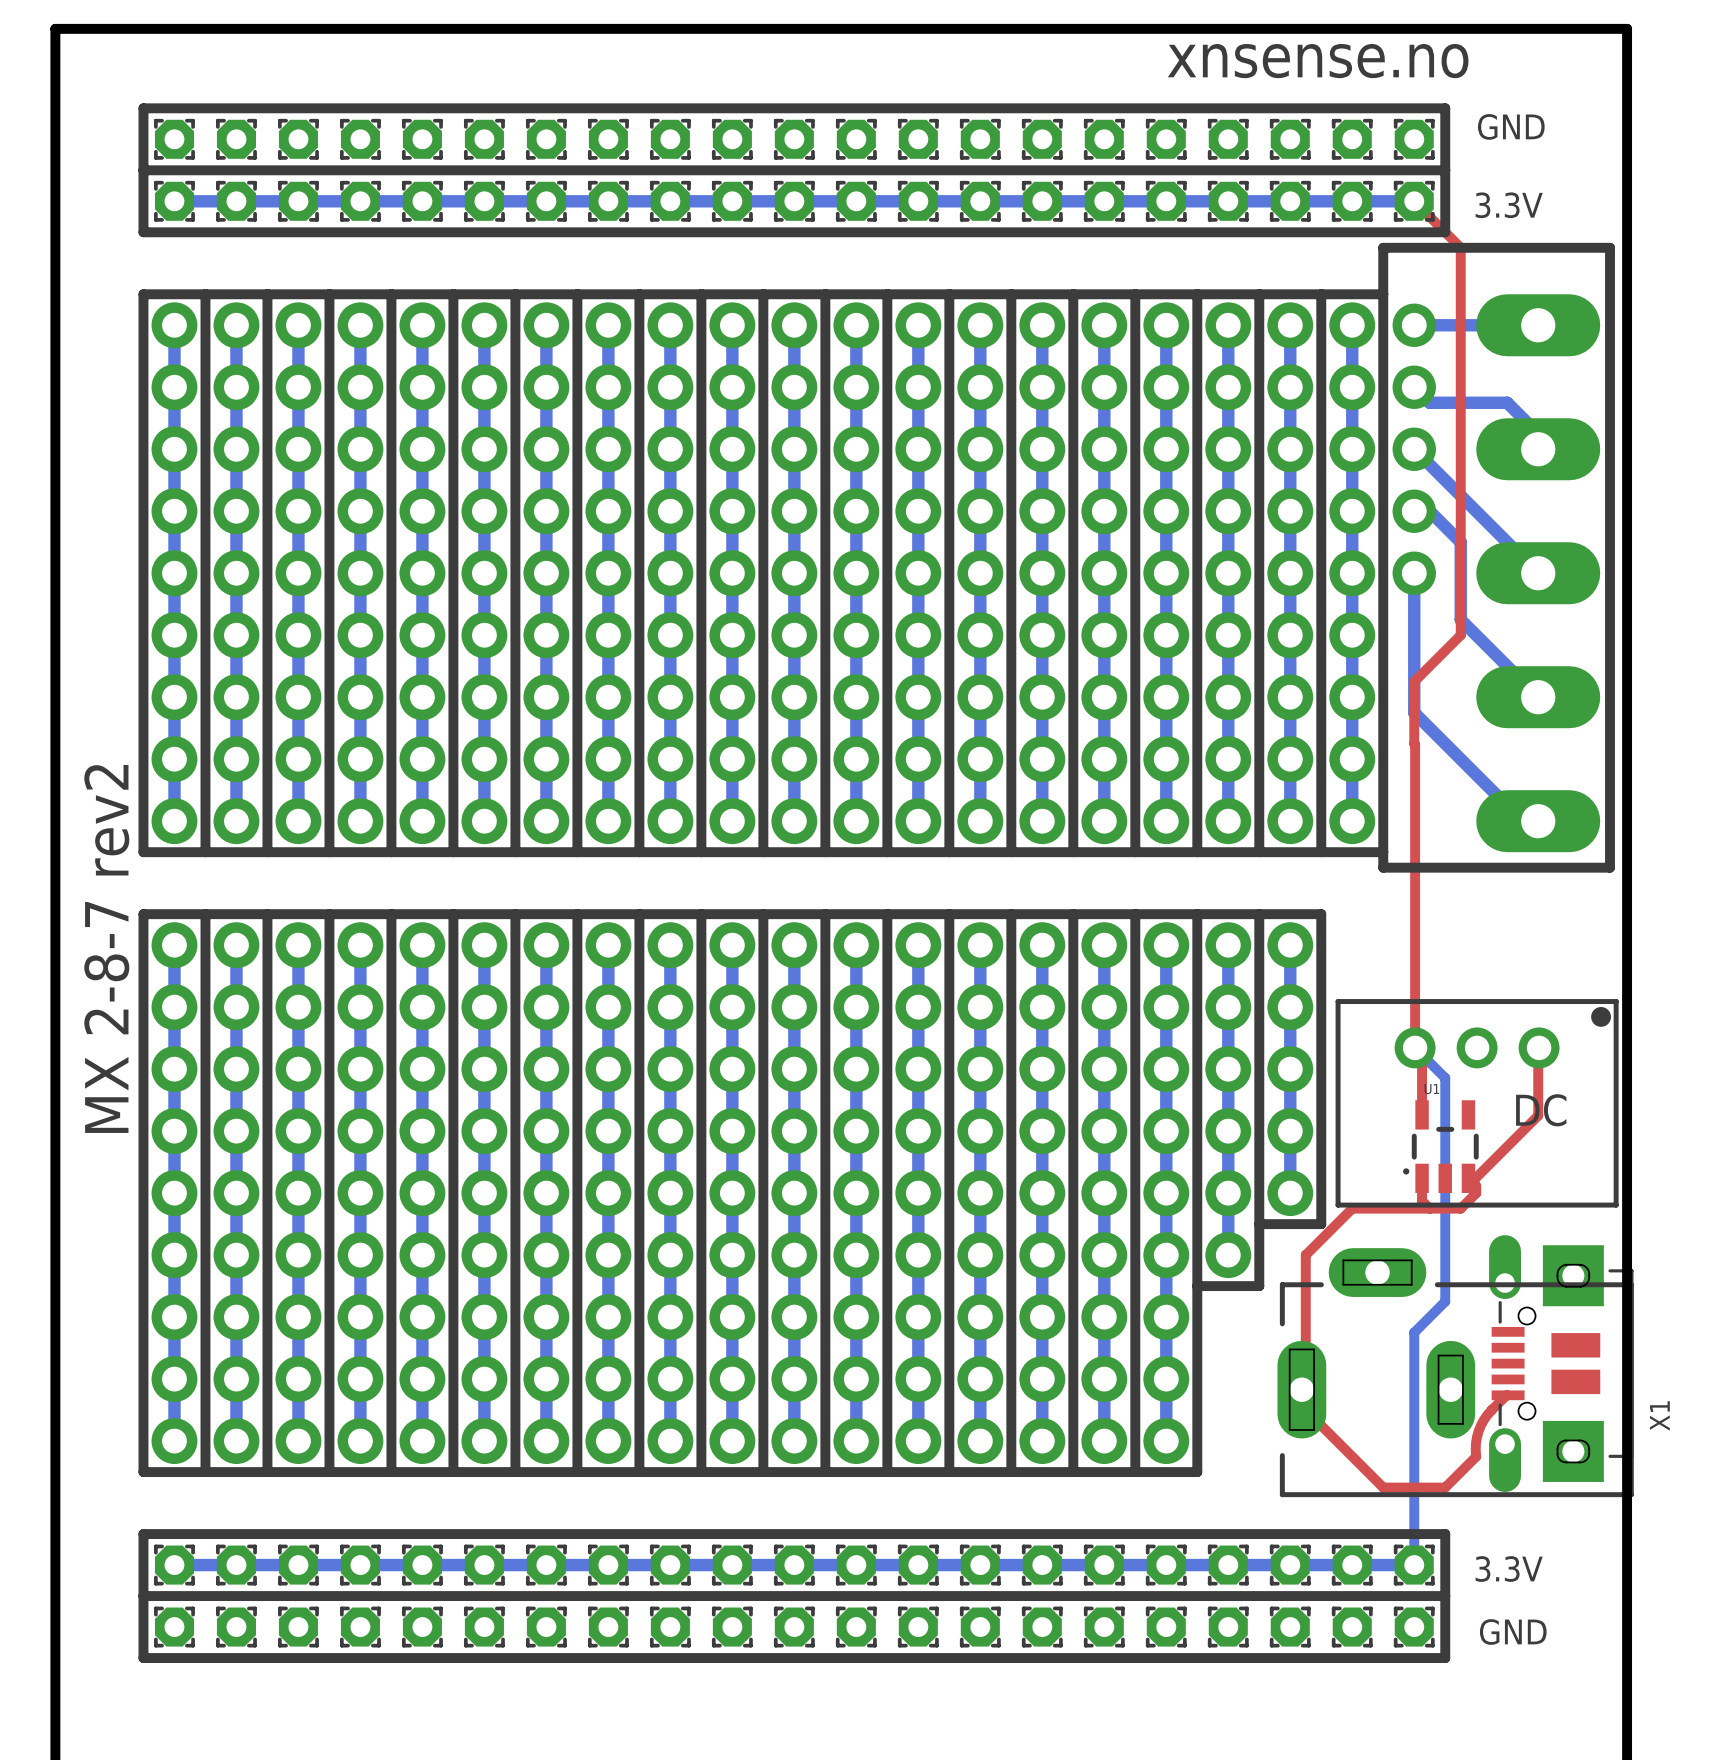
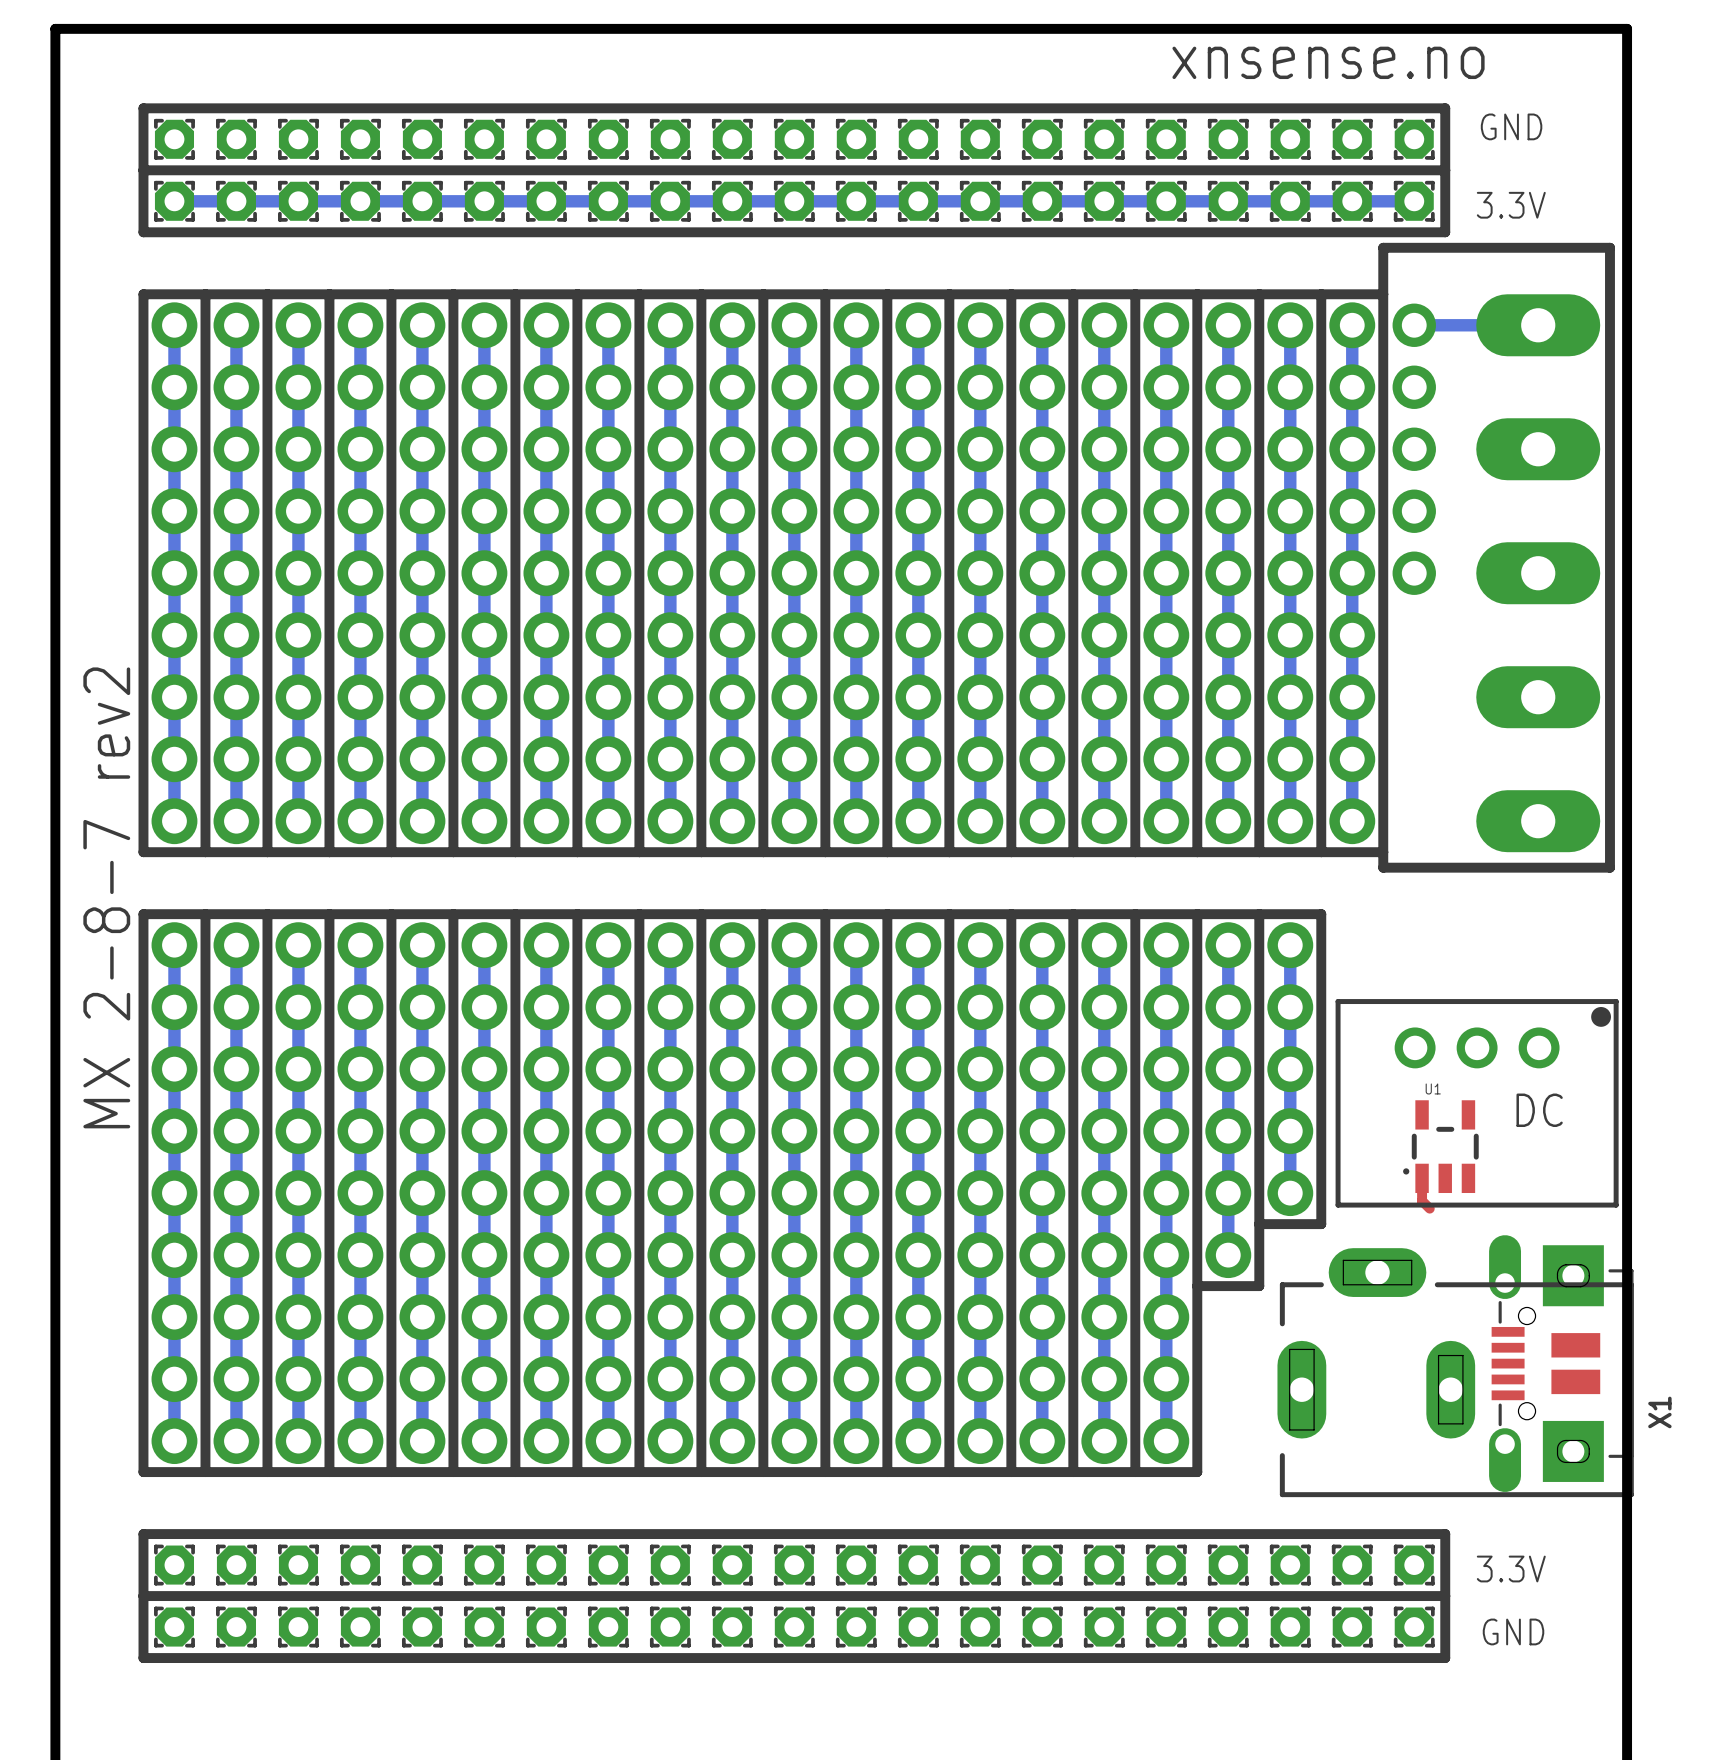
top track: (1414, 201) (1460, 247) (1460, 635) (1414, 681) (1415, 1047) (1422, 1054) (1422, 1114) -> none
bottom track: (1414, 387) (1429, 402) (1507, 402) (1538, 433) (1538, 449) -> none
bottom track: (1414, 449) (1538, 573) -> none
bottom track: (1414, 511) (1429, 511) (1460, 542) (1460, 619) (1538, 697) -> none
bottom track: (1414, 573) (1414, 712) (1507, 805) (1522, 805) (1538, 821) -> none
bottom track: (1415, 1047) (1445, 1078) (1445, 1301) (1414, 1332) (1414, 1565) (174, 1565) -> none
top track: (1539, 1047) (1538, 1115) (1475, 1178) (1468, 1178) (1476, 1186) (1476, 1193) (1460, 1208) (1352, 1208) (1305, 1255) (1305, 1385) (1296, 1394) (1290, 1394) (1383, 1487) (1445, 1487) (1476, 1456) (1476, 1437) (1480, 1425) (1491, 1410) (1508, 1395) -> none

